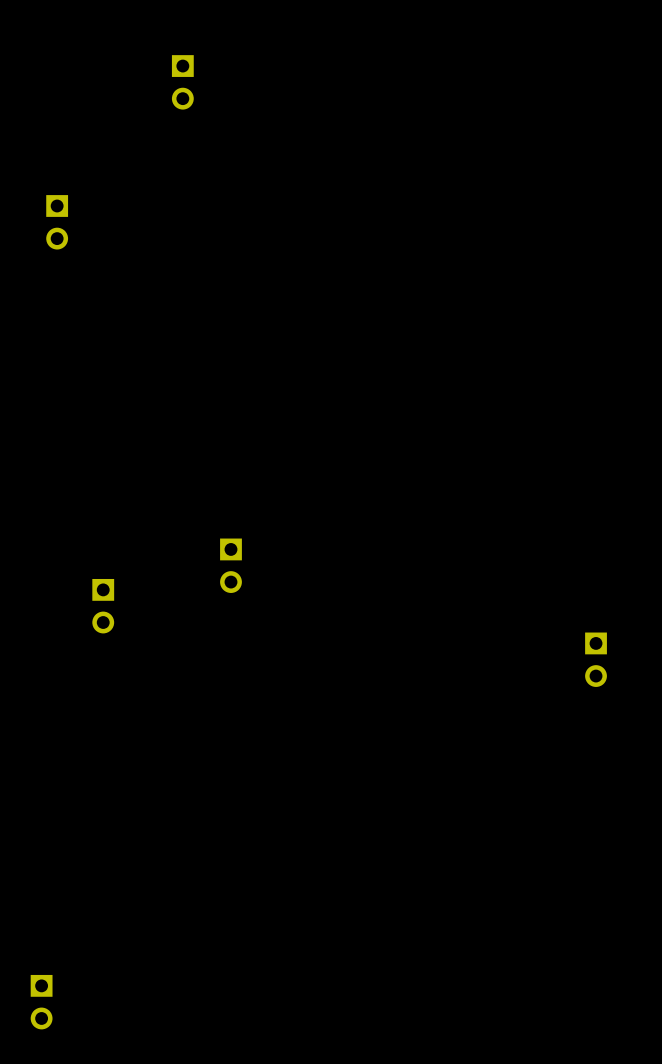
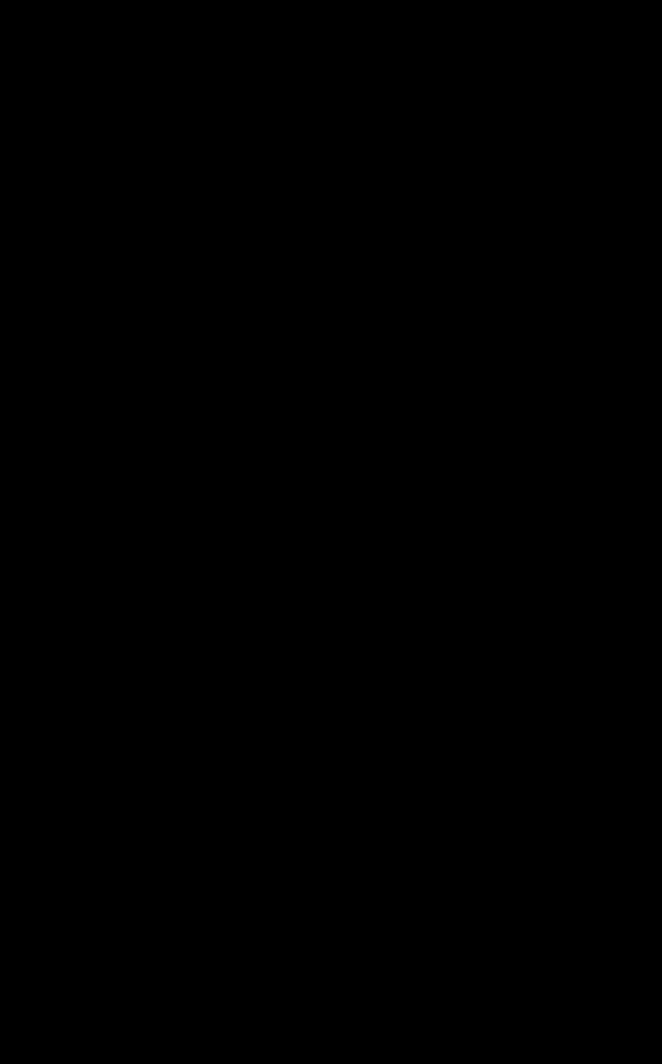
part: (182, 82) -> none
part: (57, 222) -> none
part: (230, 565) -> none
part: (103, 606) -> none
part: (596, 659) -> none
part: (41, 1002) -> none

